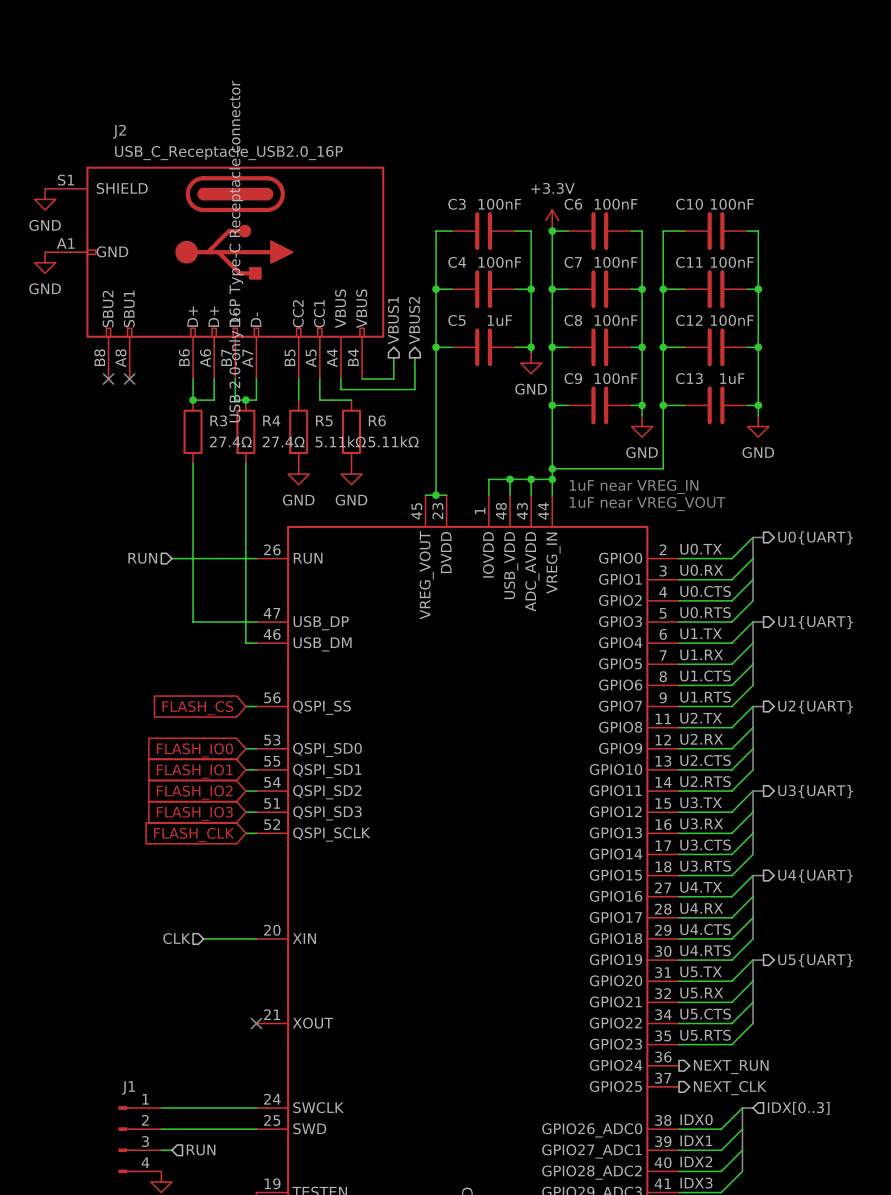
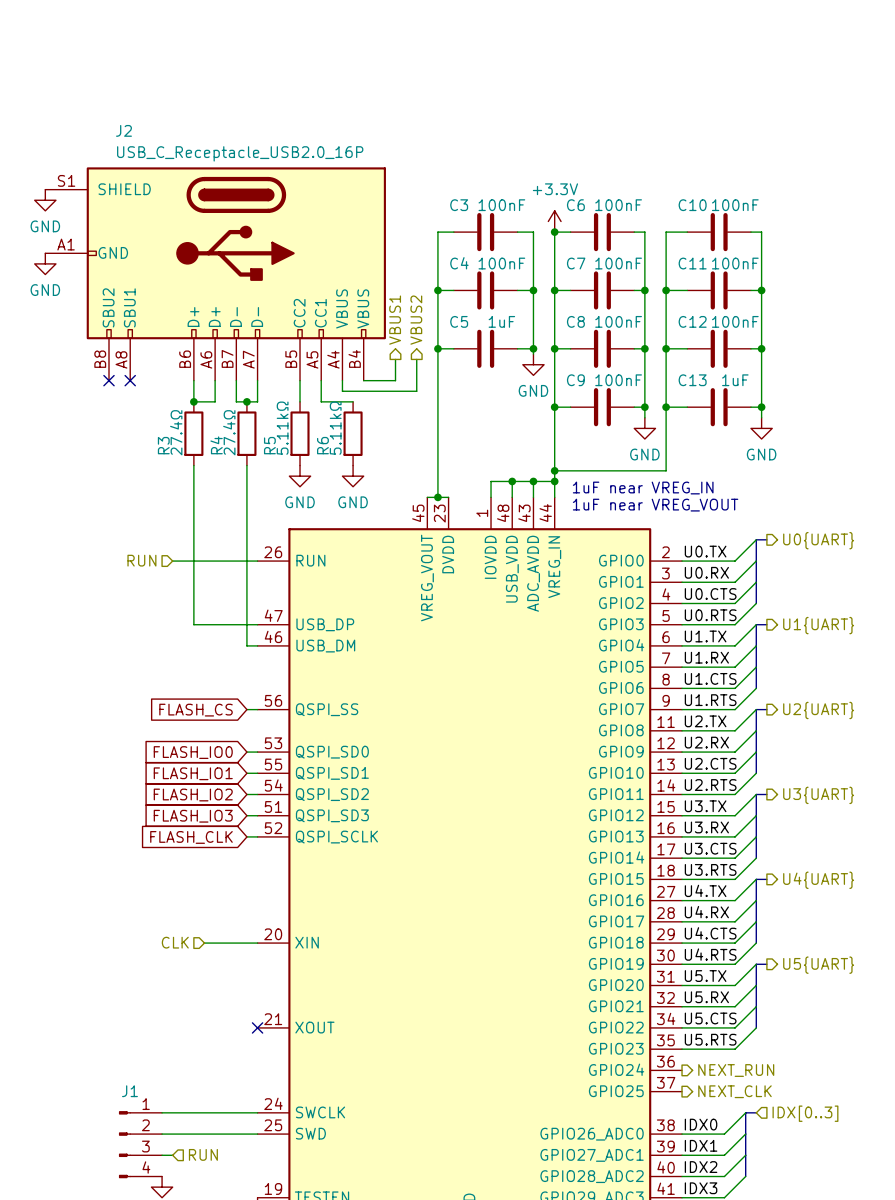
J2 text: USB 2.0-only 16P Type-C Receptacle connector (236, 251) -> none
R3 name rotation: 0° (218, 420) -> 90° counterclockwise (163, 445)
R3 name position: R3 (218, 420) -> R3 (163, 445)
R4 name rotation: 0° (271, 420) -> 90° counterclockwise (216, 445)
R4 name position: R4 (271, 420) -> R4 (216, 445)
R5 name rotation: 0° (324, 420) -> 90° counterclockwise (269, 445)
R5 name position: R5 (324, 420) -> R5 (269, 445)
R6 name rotation: 0° (377, 420) -> 90° counterclockwise (322, 445)
R6 name position: R6 (377, 420) -> R6 (322, 445)
R3 value rotation: 0° (230, 441) -> 90° counterclockwise (176, 432)
R3 value position: 27.4Ω (230, 441) -> 27.4Ω (176, 432)
R4 value rotation: 0° (283, 441) -> 90° counterclockwise (229, 432)
R4 value position: 27.4Ω (283, 441) -> 27.4Ω (229, 432)
R5 value rotation: 0° (340, 441) -> 90° counterclockwise (282, 428)
R5 value position: 5.11kΩ (340, 441) -> 5.11kΩ (282, 428)
R6 value rotation: 0° (393, 441) -> 90° counterclockwise (335, 428)
R6 value position: 5.11kΩ (393, 441) -> 5.11kΩ (335, 428)

